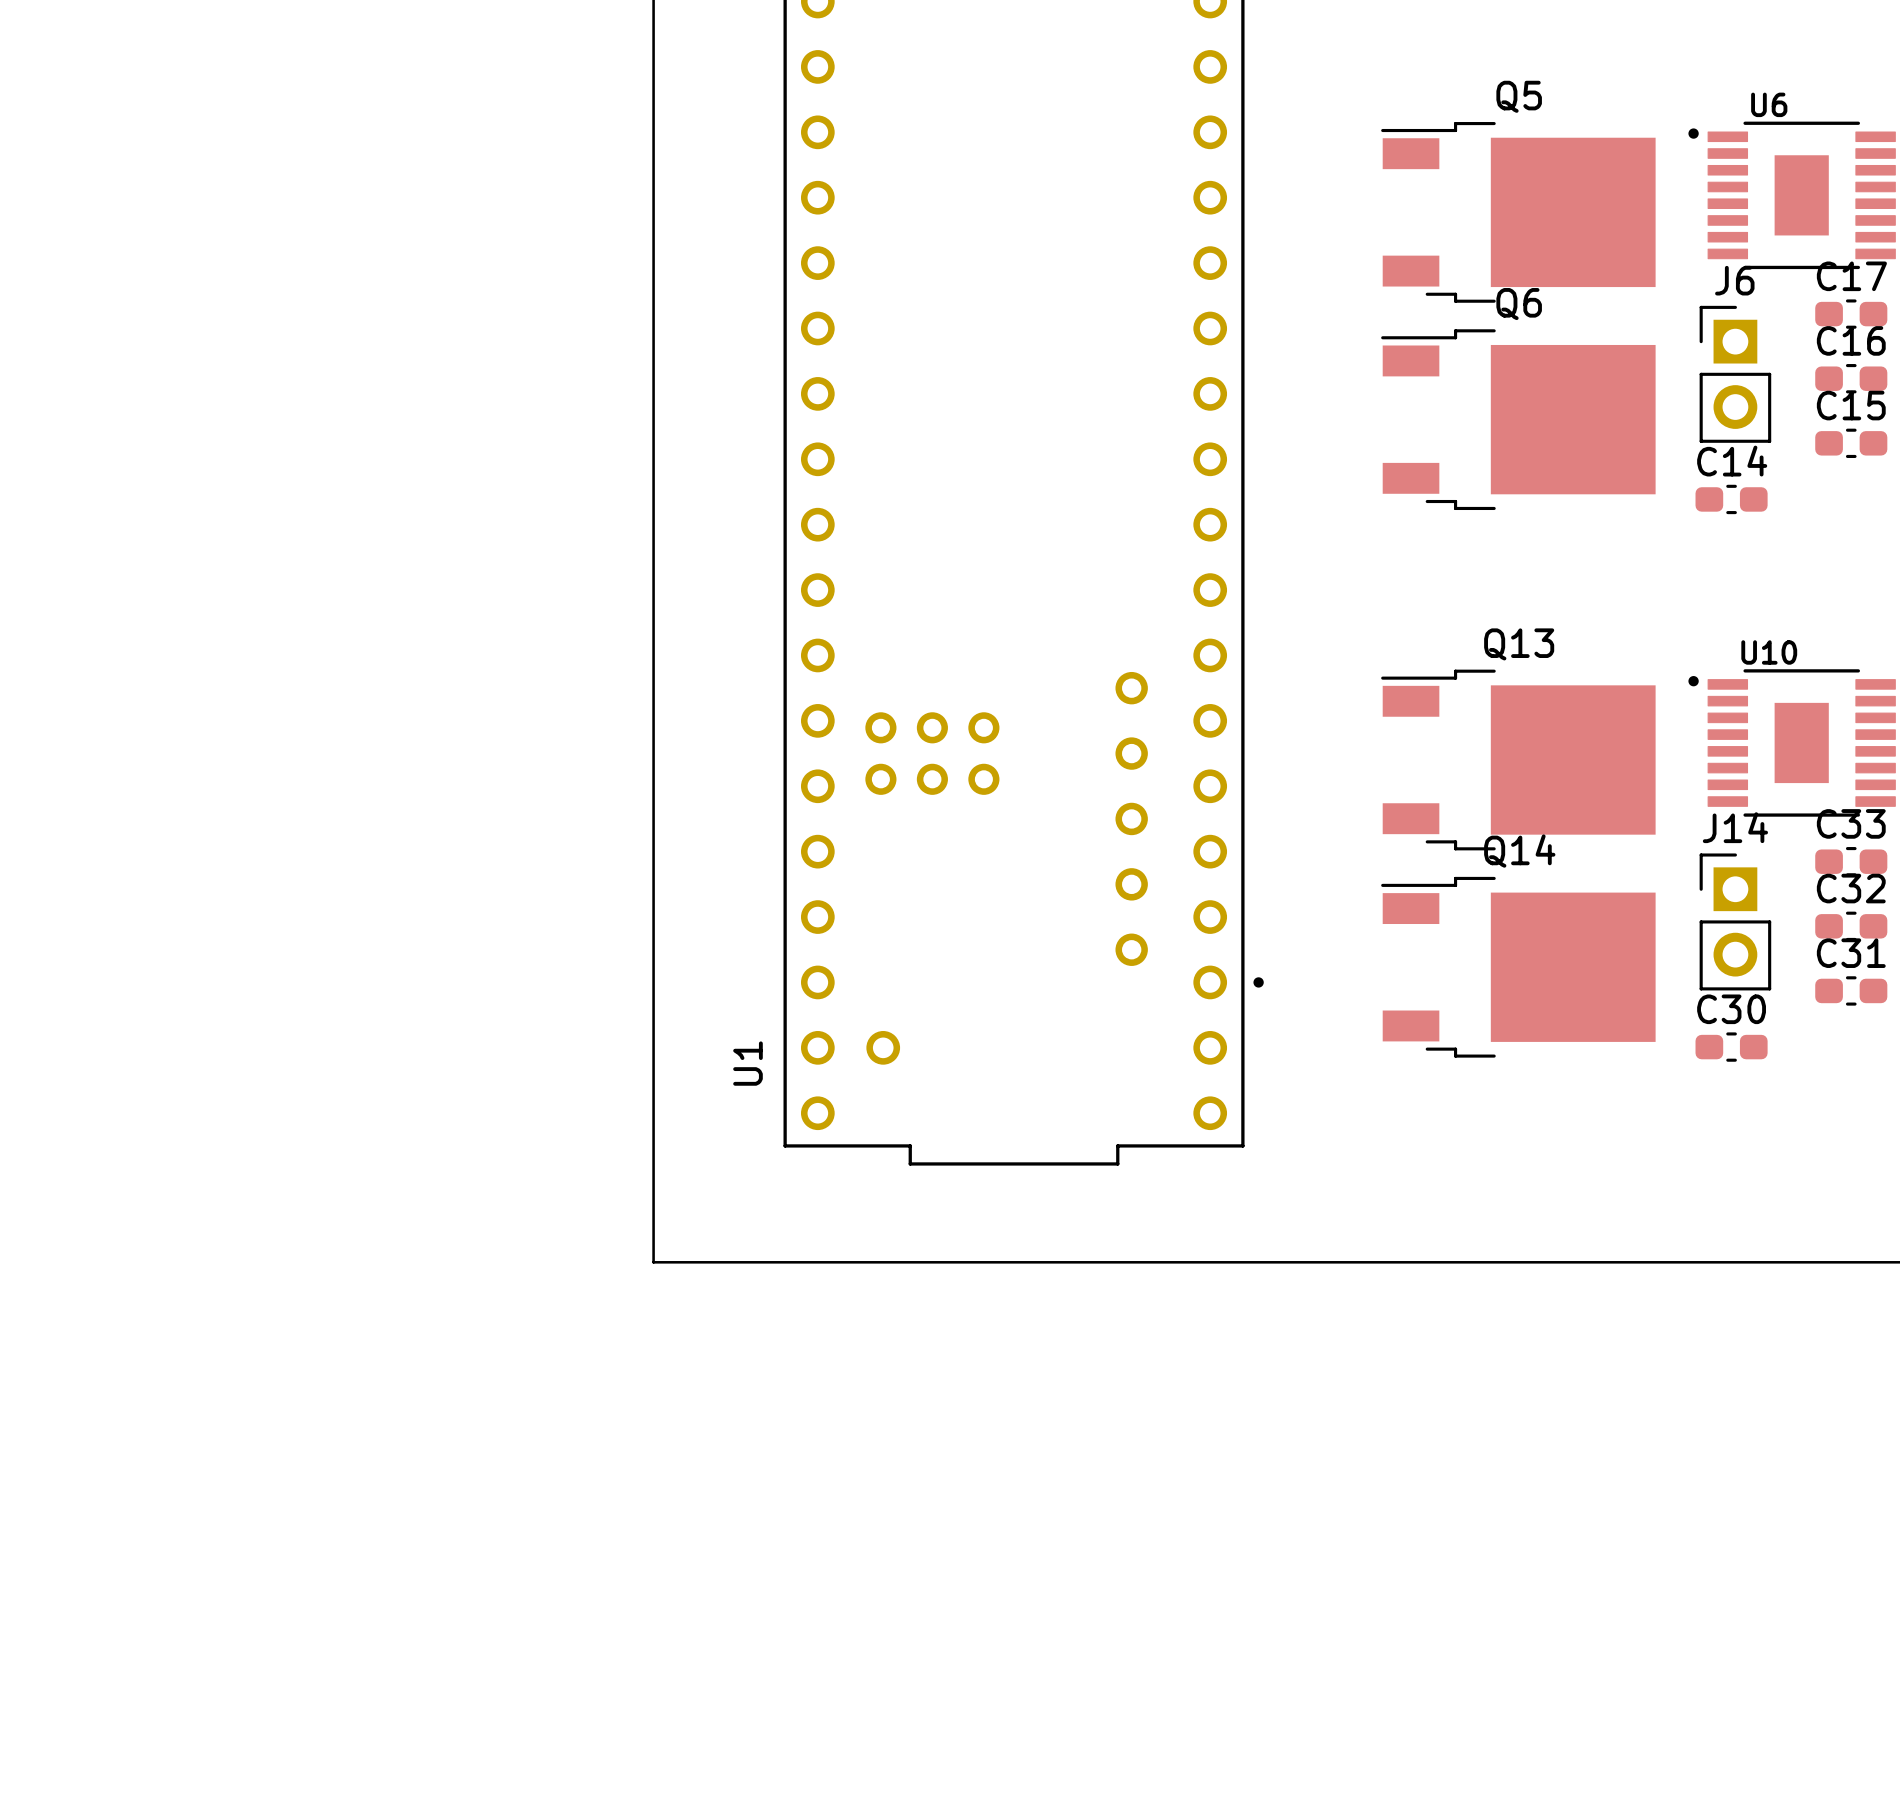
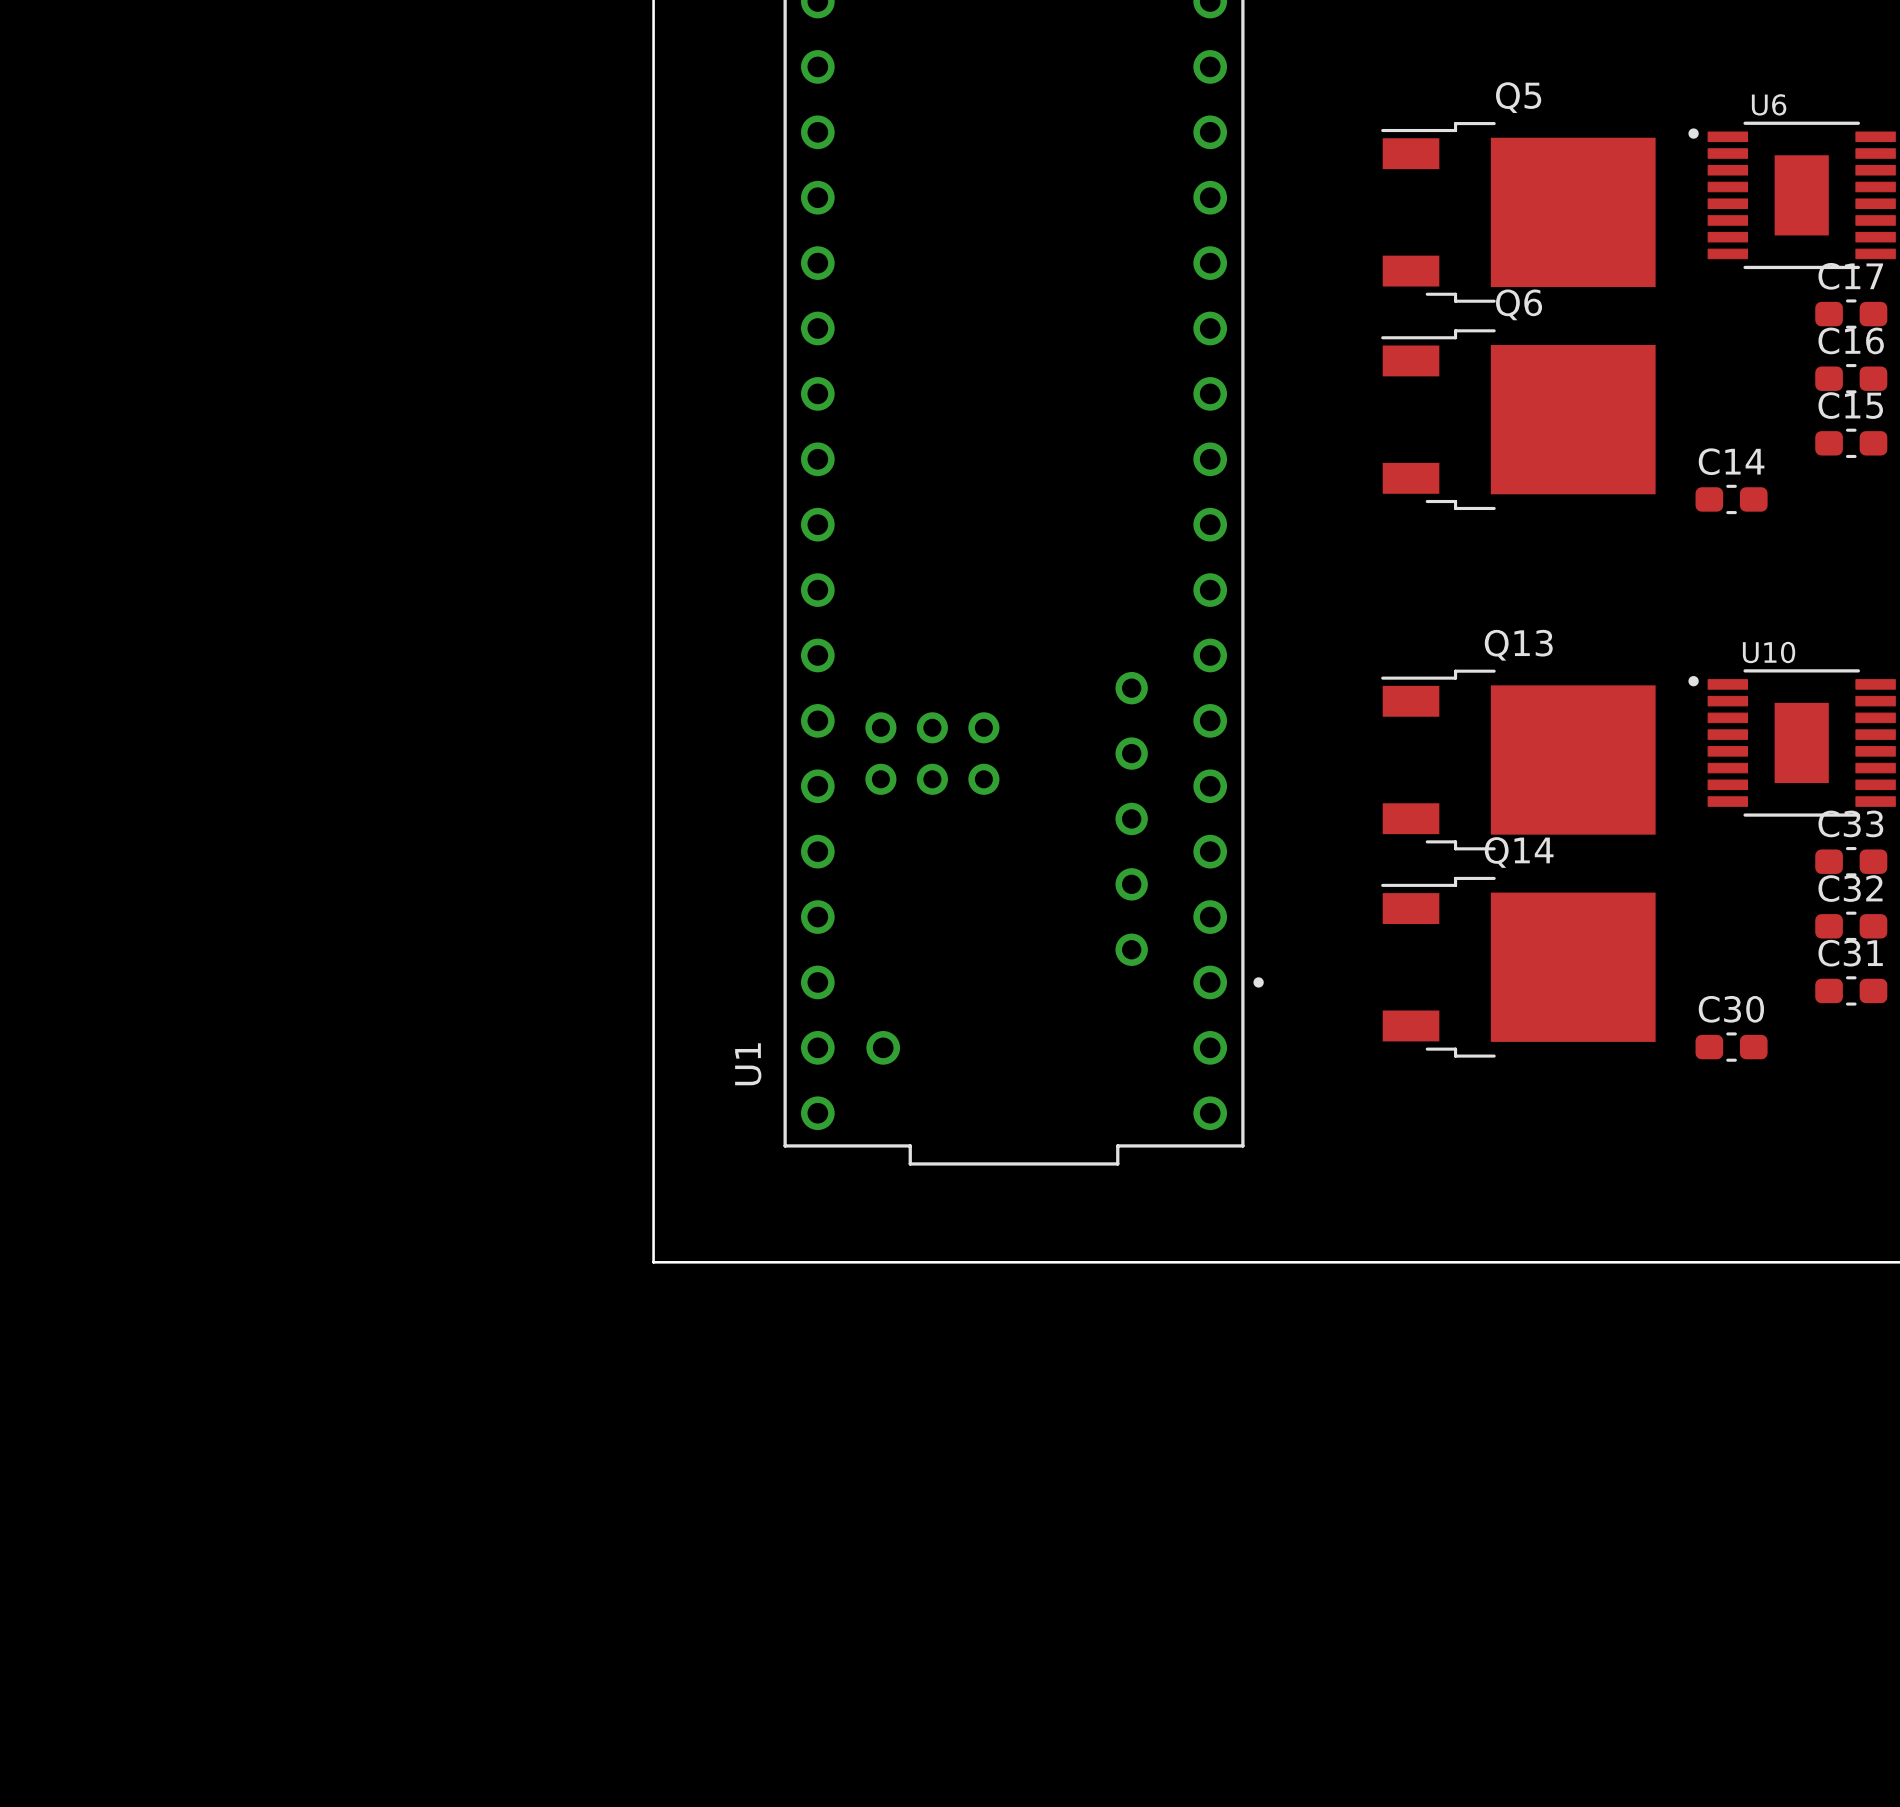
J6: (1735, 374) -> none
J14: (1735, 921) -> none

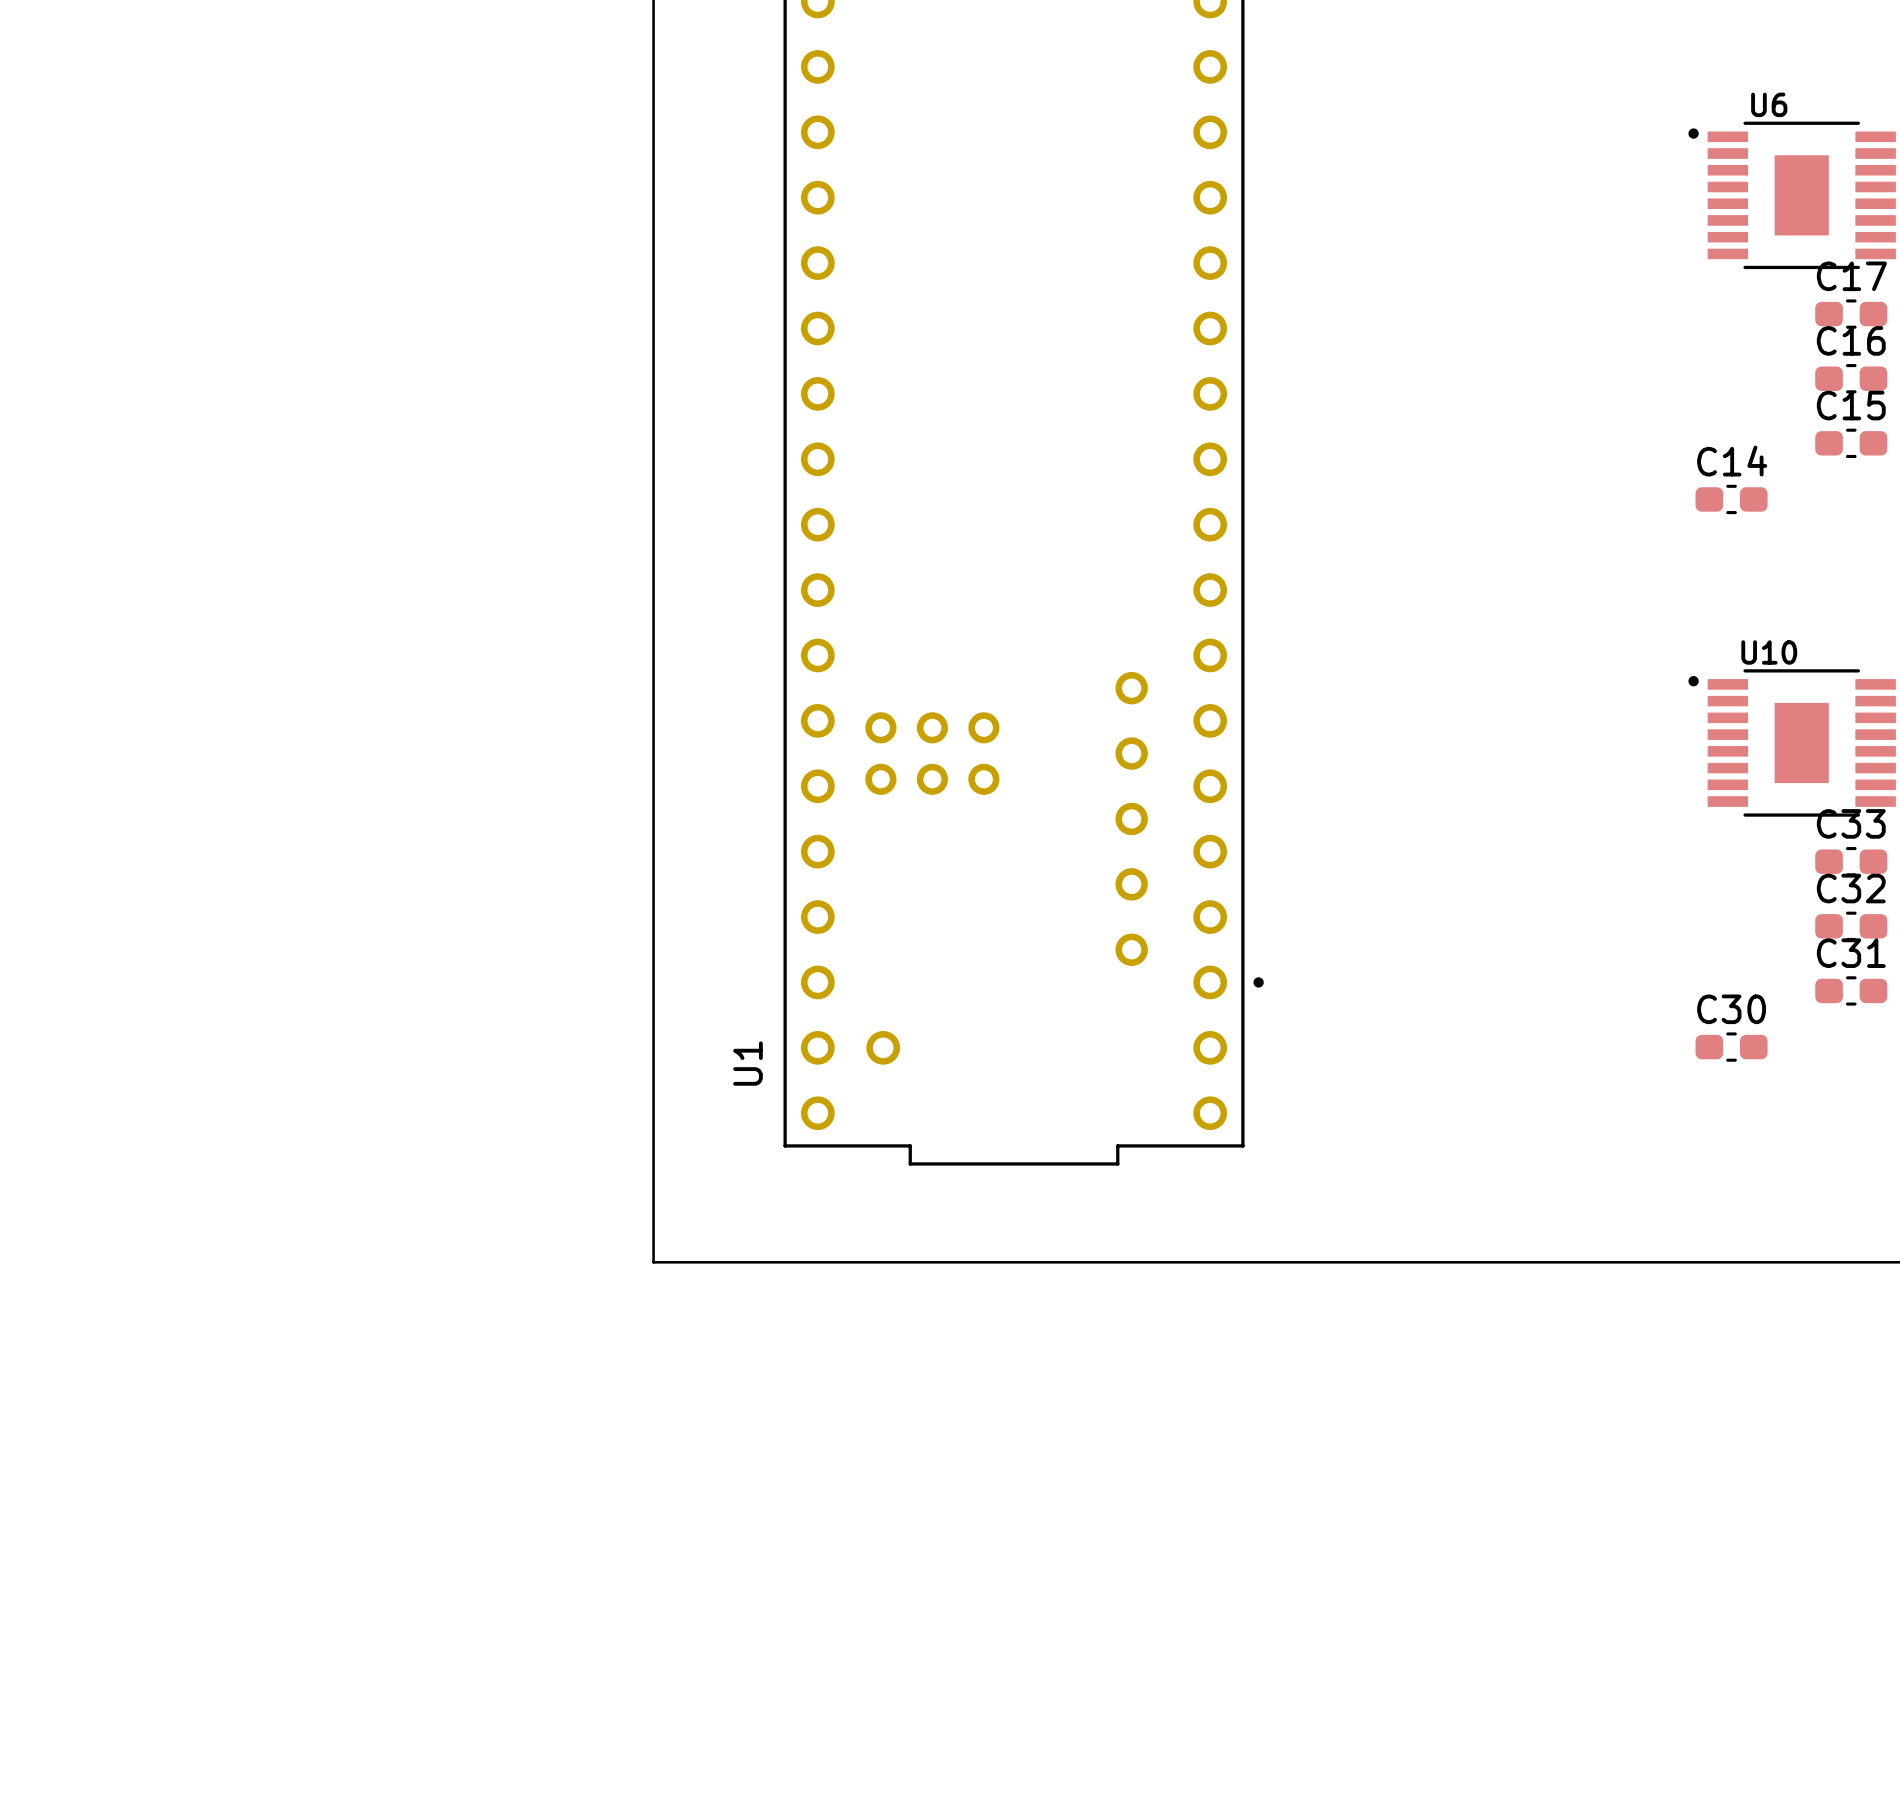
Q5: (1518, 212) -> none
Q6: (1518, 419) -> none
Q13: (1518, 760) -> none
Q14: (1518, 967) -> none

